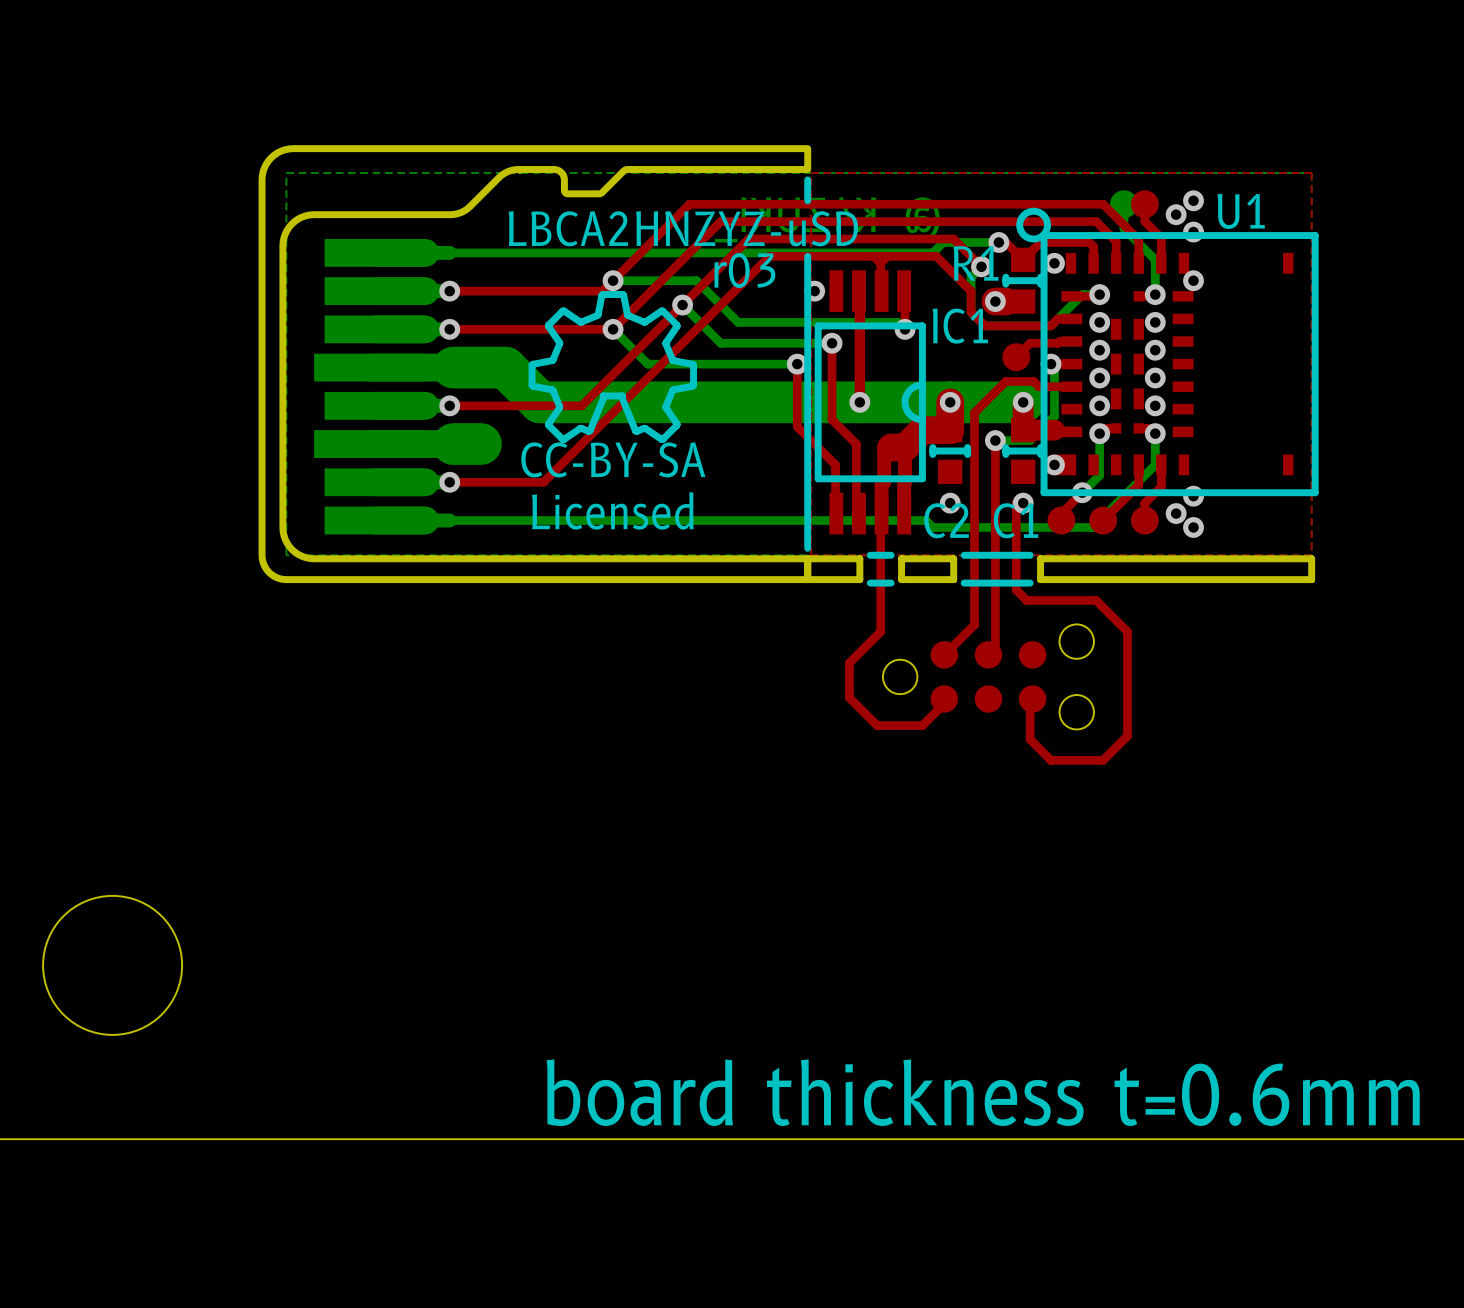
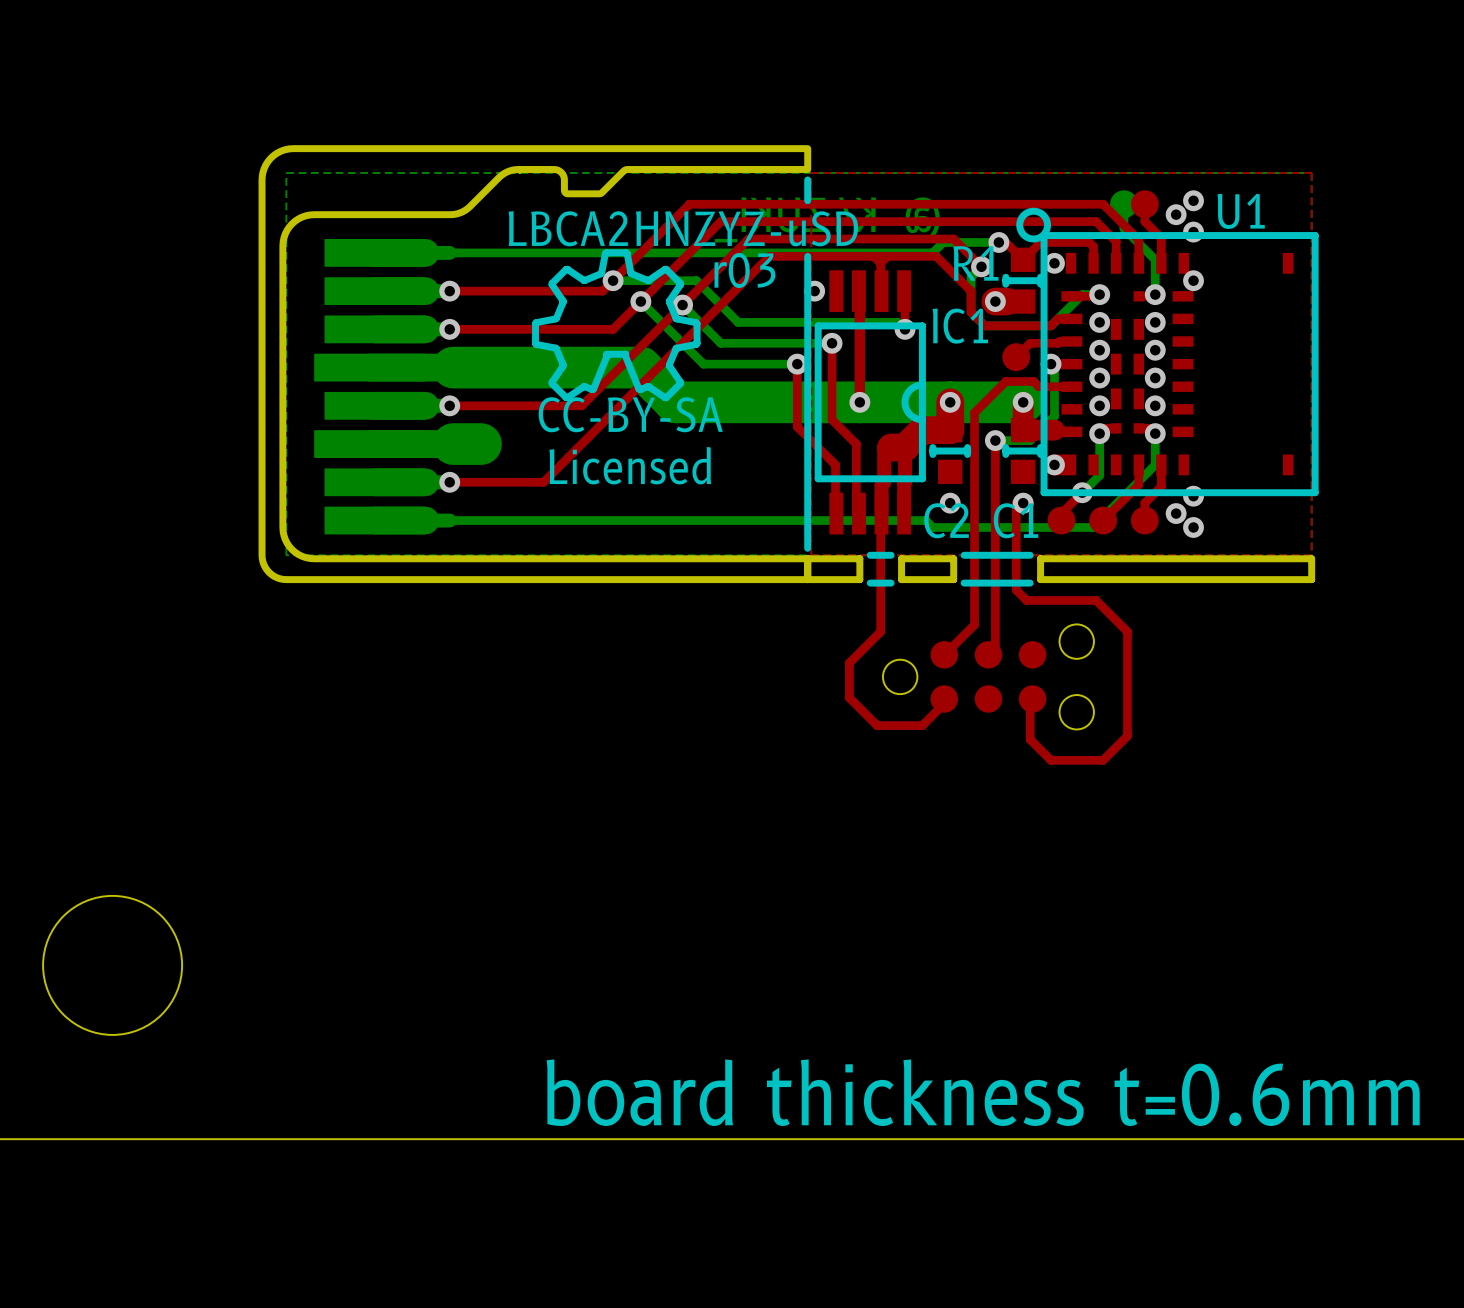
line: none -> (606, 252) (601, 273) (583, 280) (566, 269) (552, 283) (563, 302) (555, 318) (535, 323) (535, 343) (556, 348) (563, 365) (552, 383) (566, 397) (583, 386) (593, 389) (606, 354) (625, 354) (638, 389) (648, 386) (666, 397) (680, 383) (669, 365) (676, 348) (697, 343) (697, 323) (676, 318) (669, 302) (680, 283) (665, 269) (647, 280) (630, 272) (626, 252) (606, 252)
drawing: [528, 290, 698, 443] -> none
bottom track: (613, 329) (647, 364) (703, 364) -> (640, 301) (703, 364)
via position: (613, 329) -> (640, 301)
bottom track: (505, 367) (540, 402) (675, 402) -> (505, 367) (640, 367) (675, 402)
text position: CC-BY-SA (613, 459) -> CC-BY-SA (630, 414)
text position: Licensed (612, 510) -> Licensed (630, 465)

